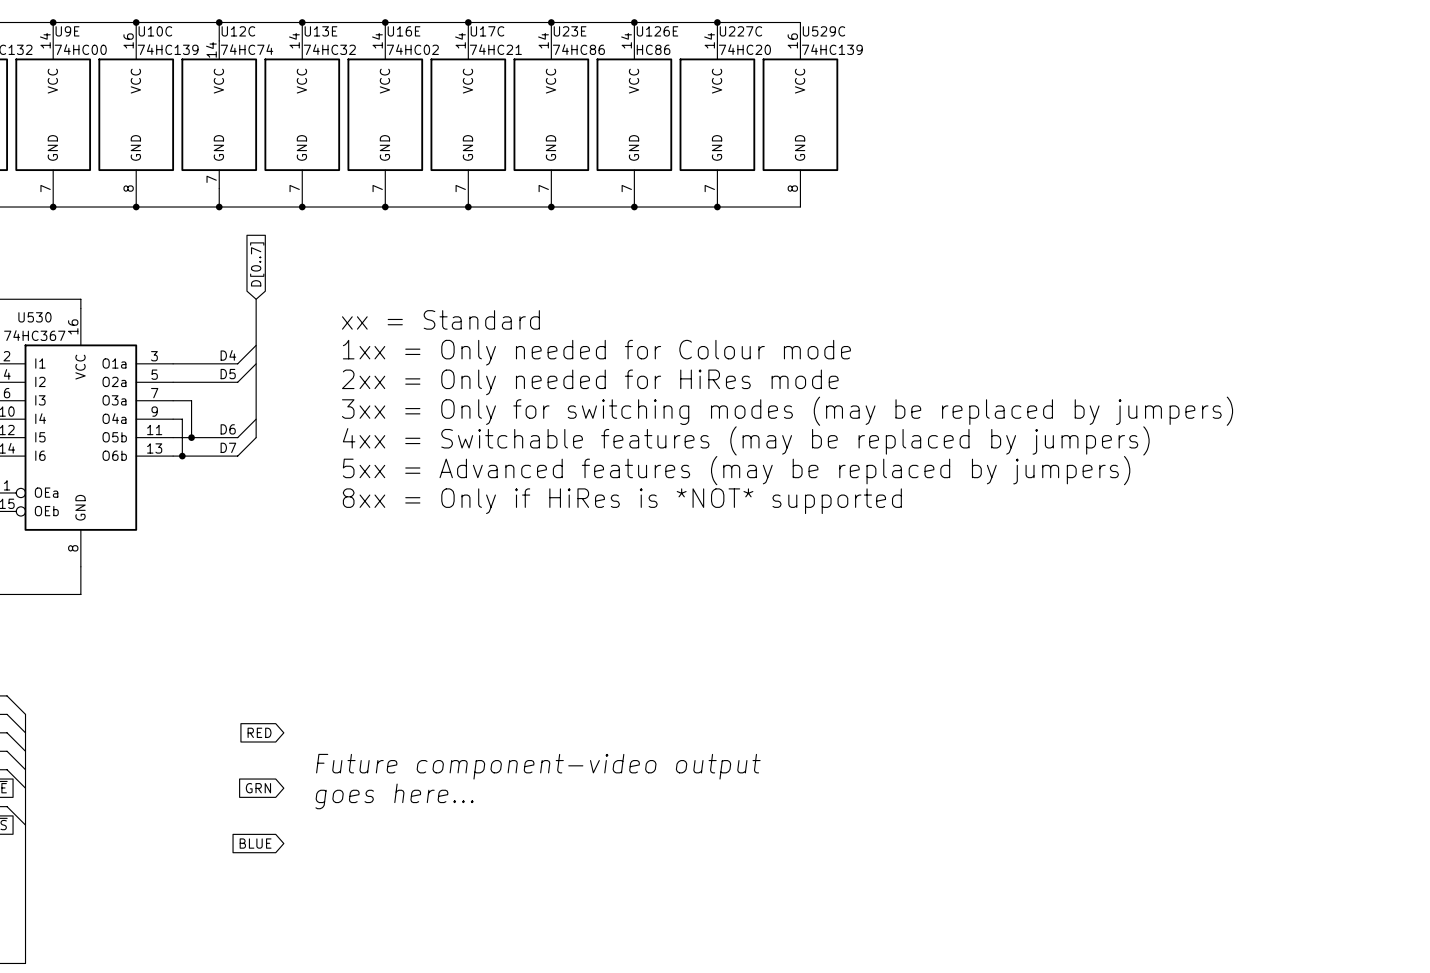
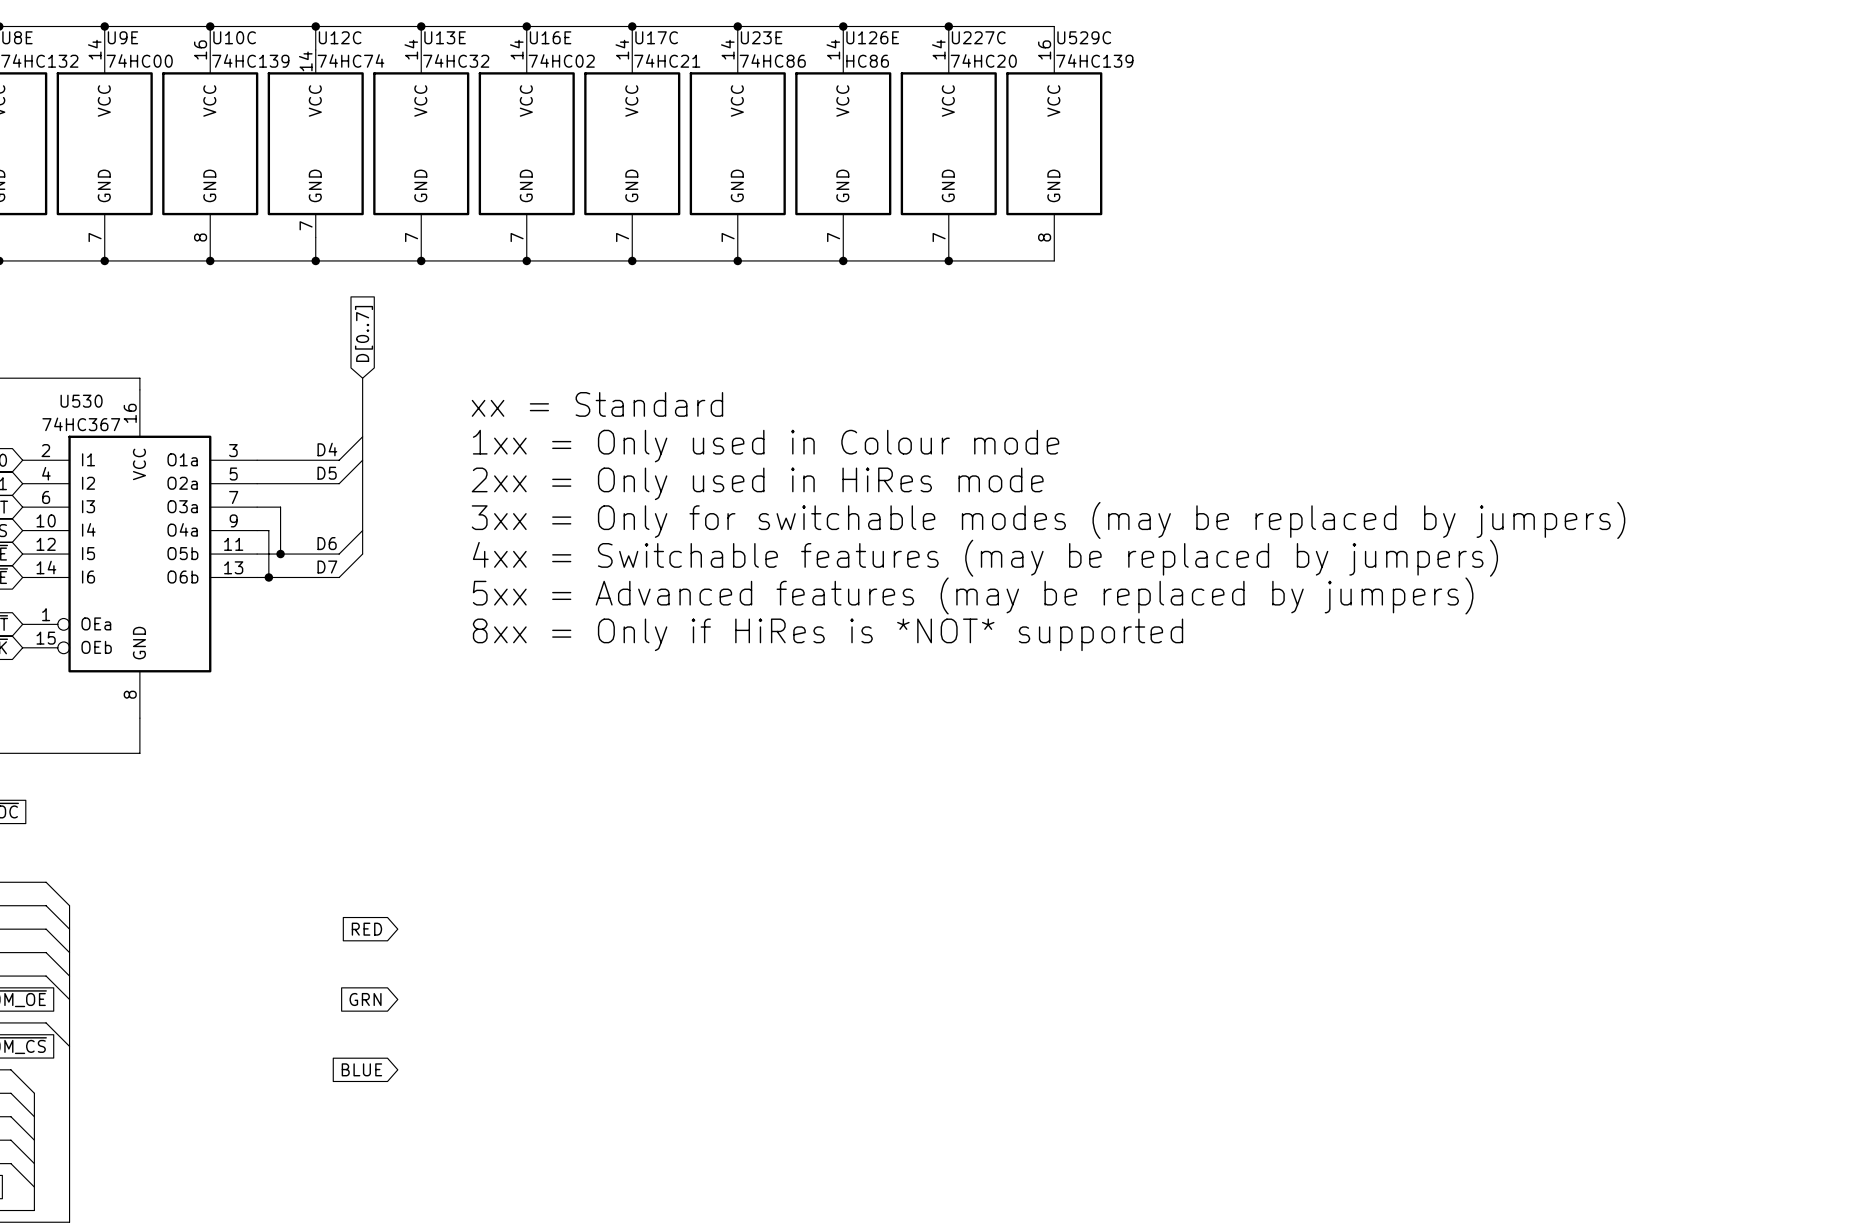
text: 1xx = Only needed for Colour mode (596, 352) -> 1xx = Only used in Colour mode (766, 446)
text: 2xx = Only needed for HiRes mode (590, 382) -> 2xx = Only used in HiRes mode (757, 483)
text: 3xx = Only for switching modes (may be replaced by jumpers) (787, 411) -> 3xx = Only for switchable modes (may be replaced by jumpers) (1048, 520)
text: Future component-video output (538, 766) -> none
text: goes here… (394, 796) -> none

